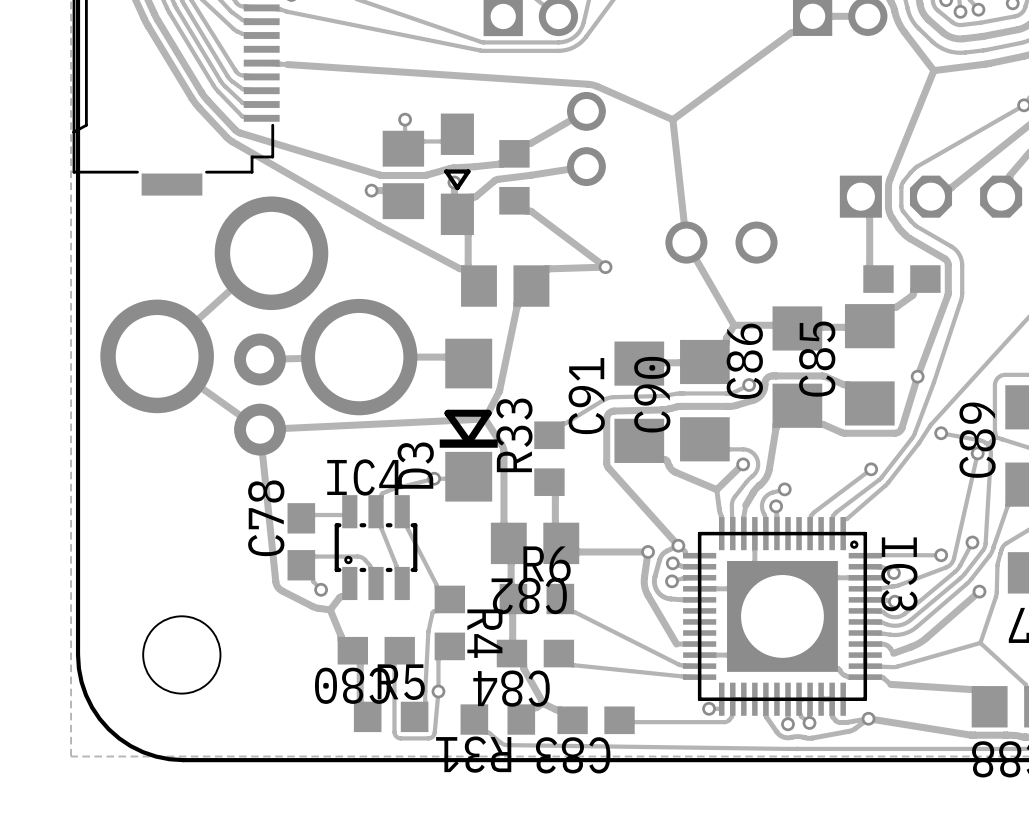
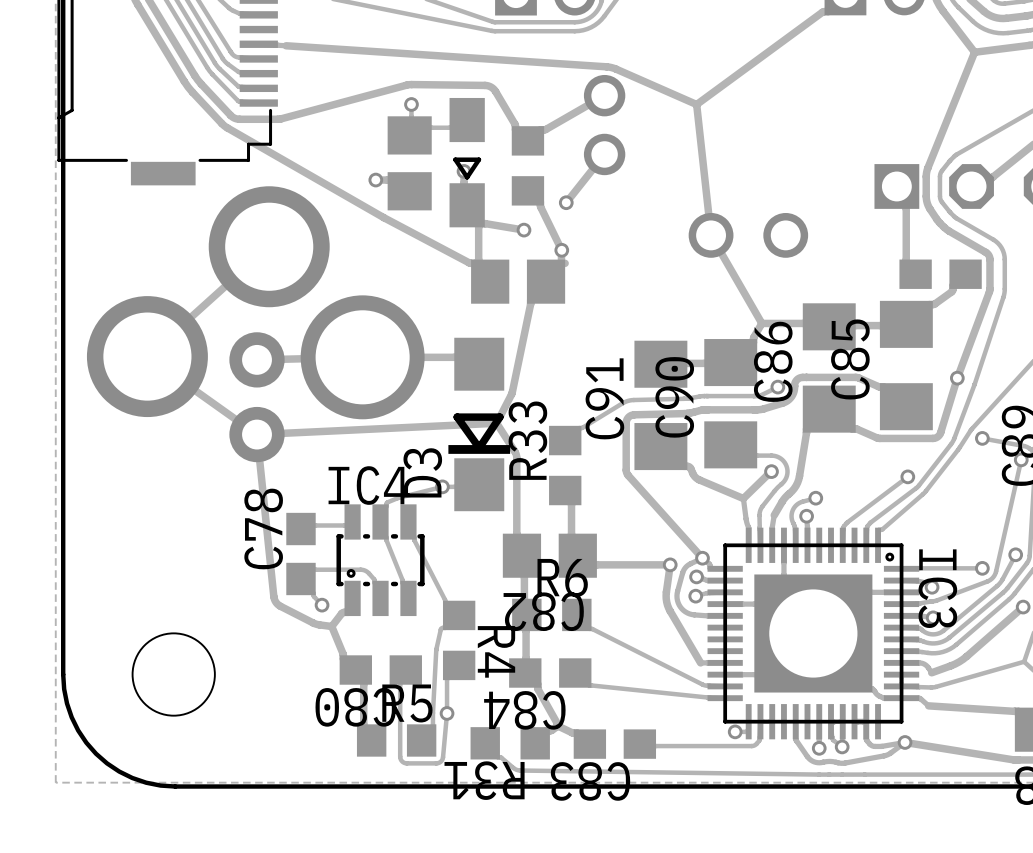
track: (235, 129) (240, 133) (380, 175) (421, 175) -> (230, 115) (238, 119) (280, 119) (408, 84) (486, 85) (494, 90) (515, 124) (515, 129) (527, 140)
track: (514, 153) (502, 164) (452, 168) (424, 175) -> none
track: (586, 166) (530, 175) -> (604, 154) (566, 202)
track: (530, 175) (495, 180) (475, 196) (470, 197) (457, 214) -> (523, 230) (481, 223) (467, 205)
track: (526, 211) (531, 211) (605, 267) (549, 268) -> (540, 201) (540, 207) (561, 250) (561, 259)
via: none -> (566, 202)
via: none -> (523, 230)
via: none -> (561, 250)
via: (605, 267) -> none

